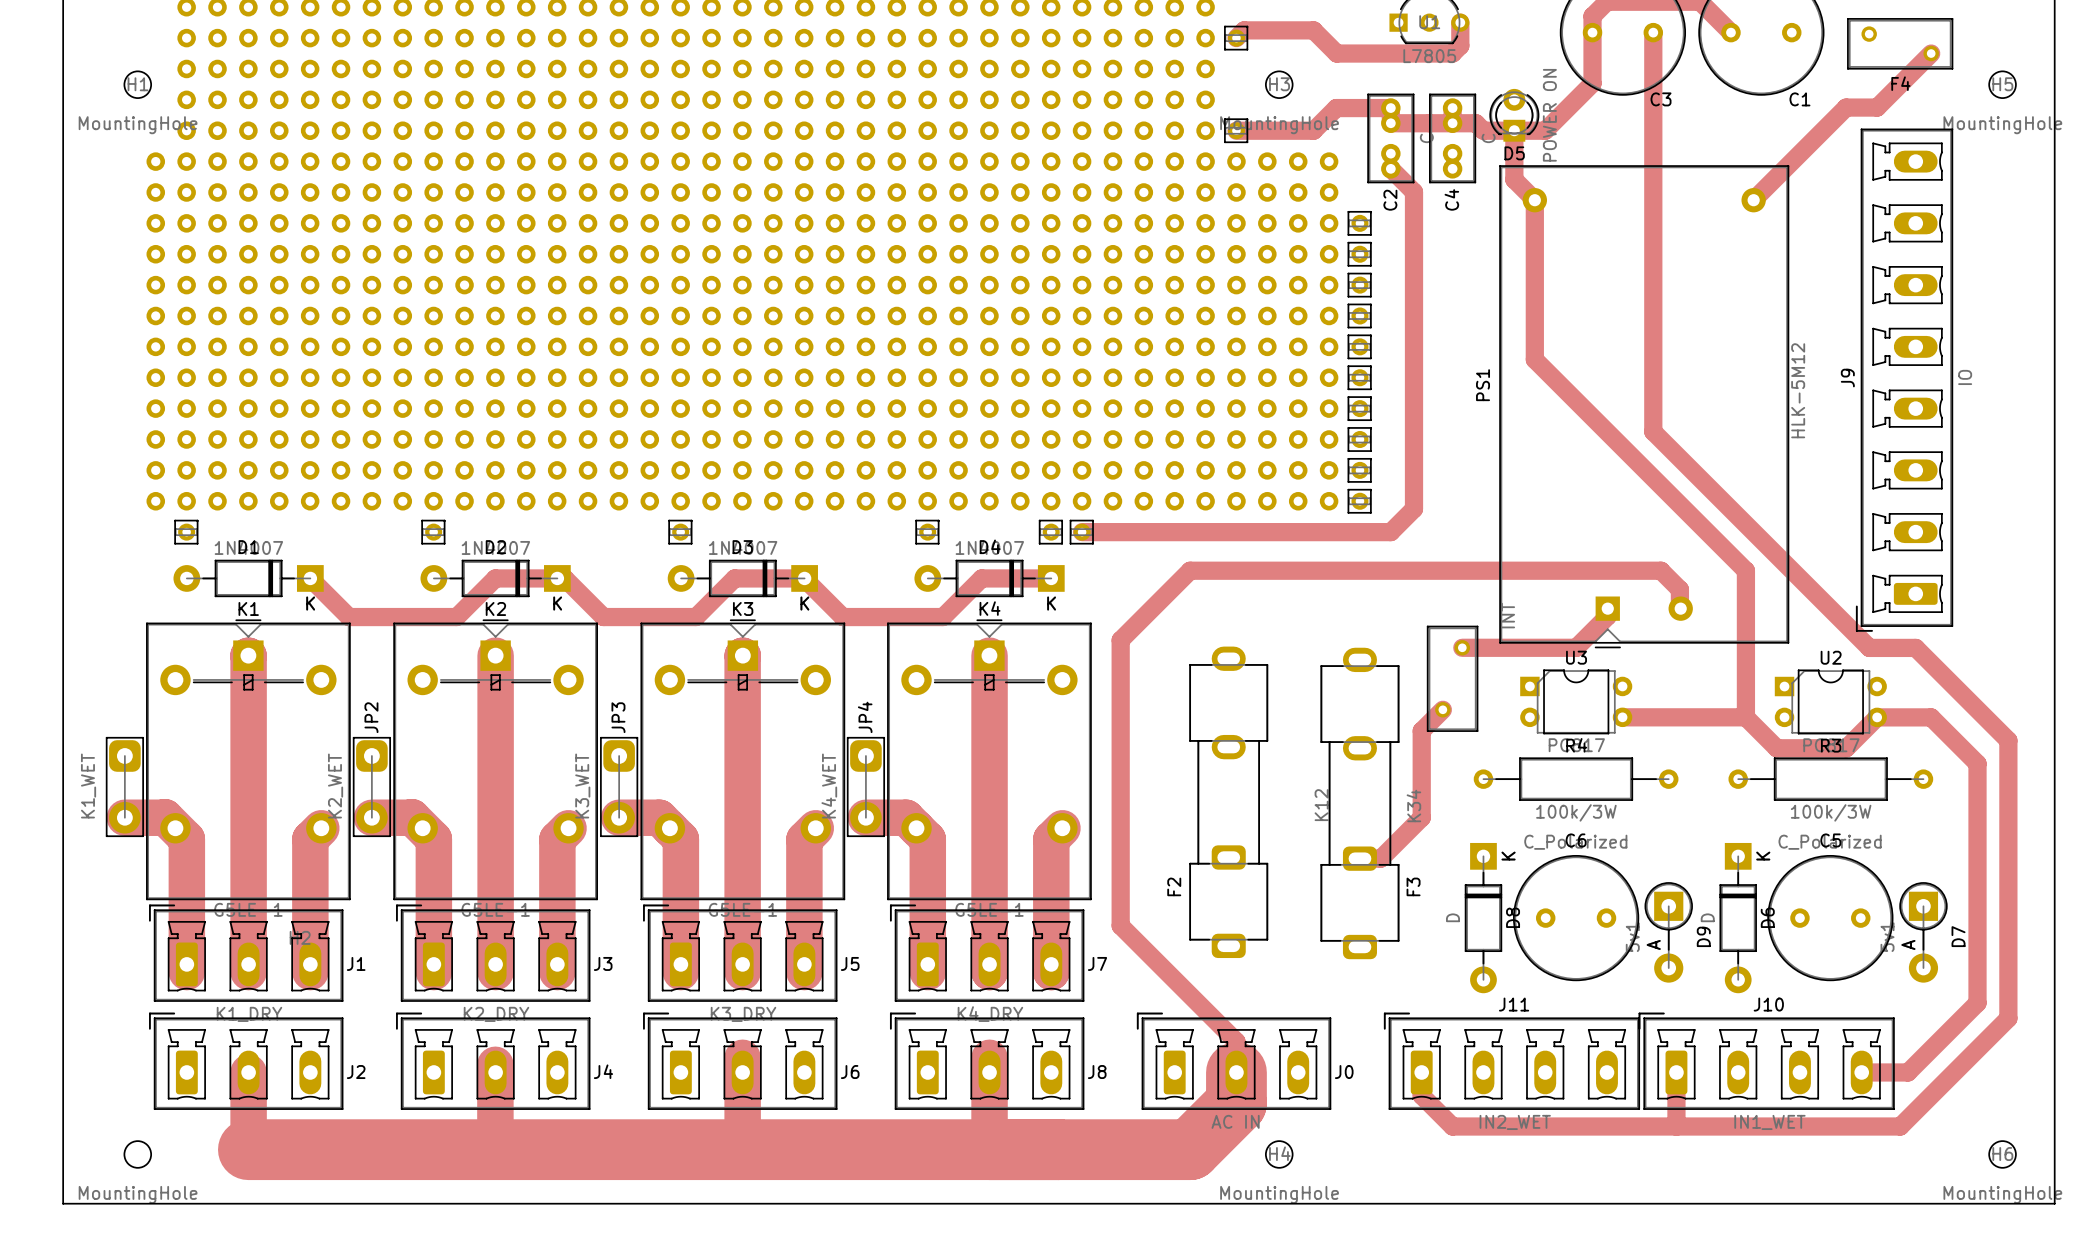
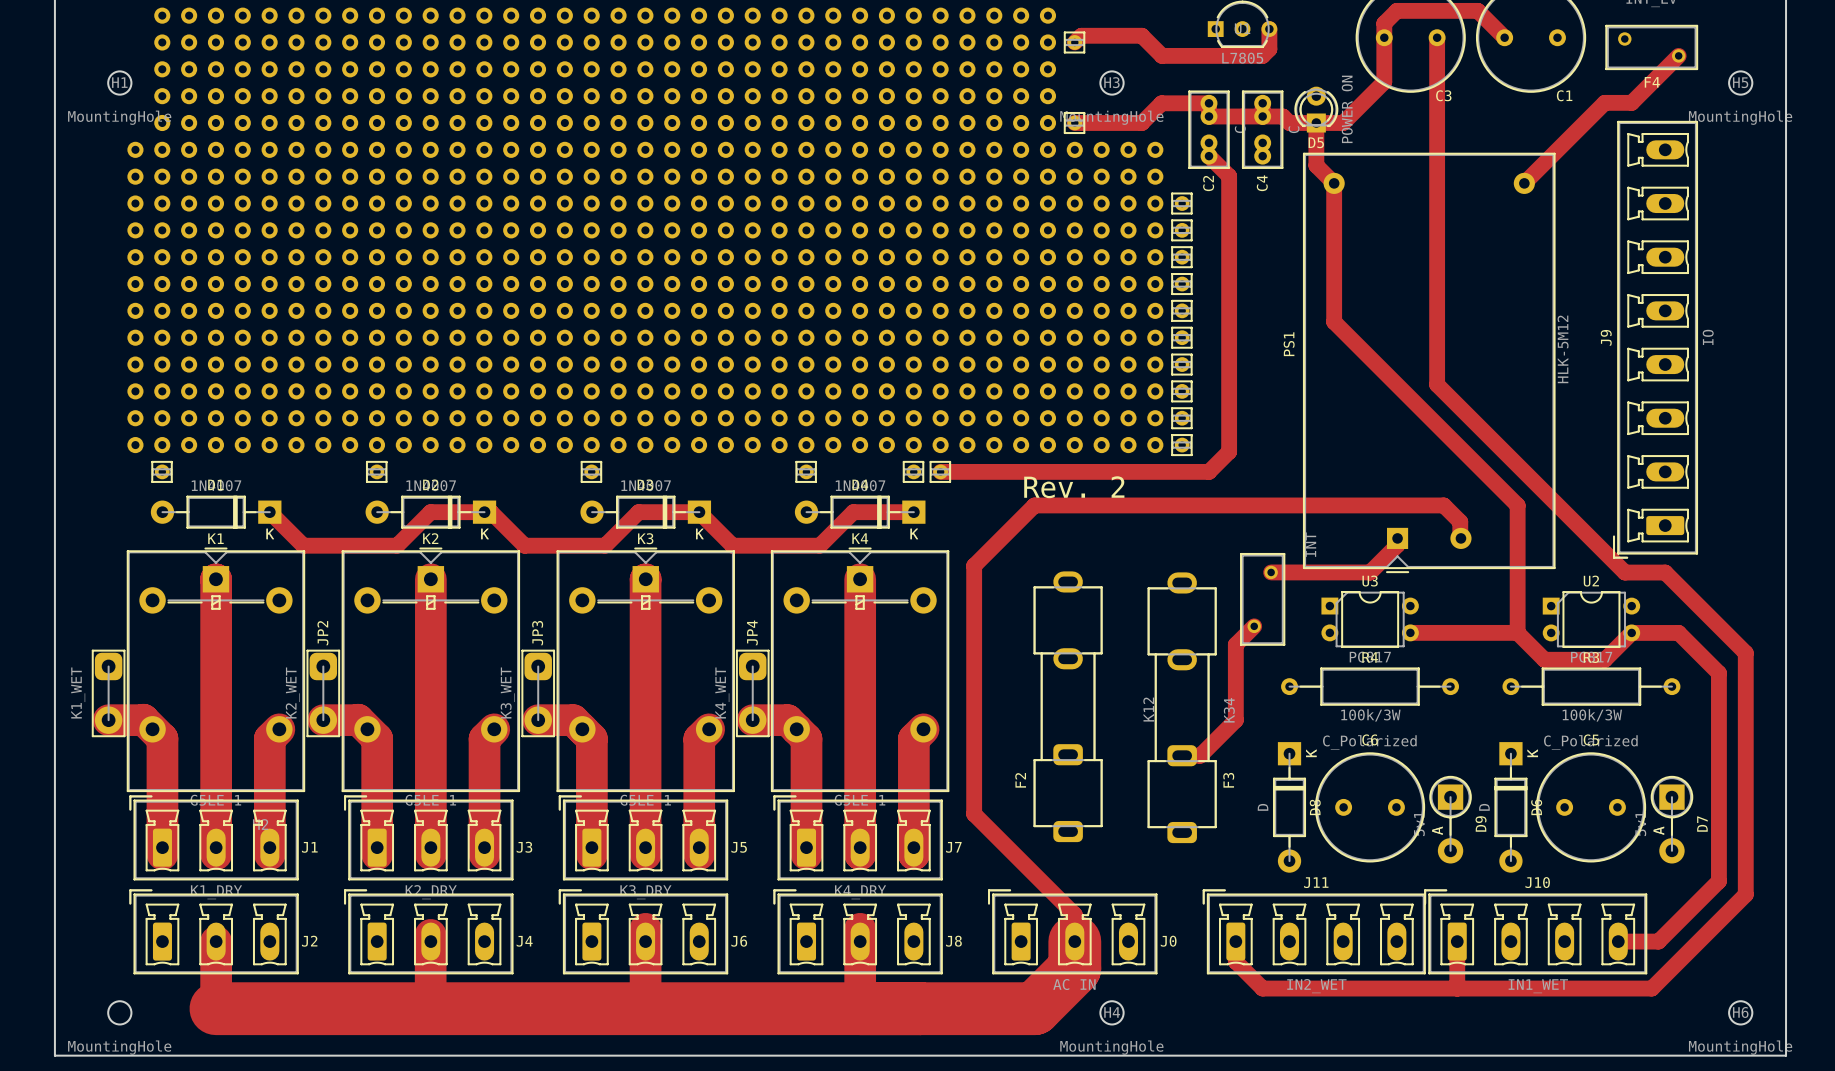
text: none -> Rev. 2 (1074, 487)

